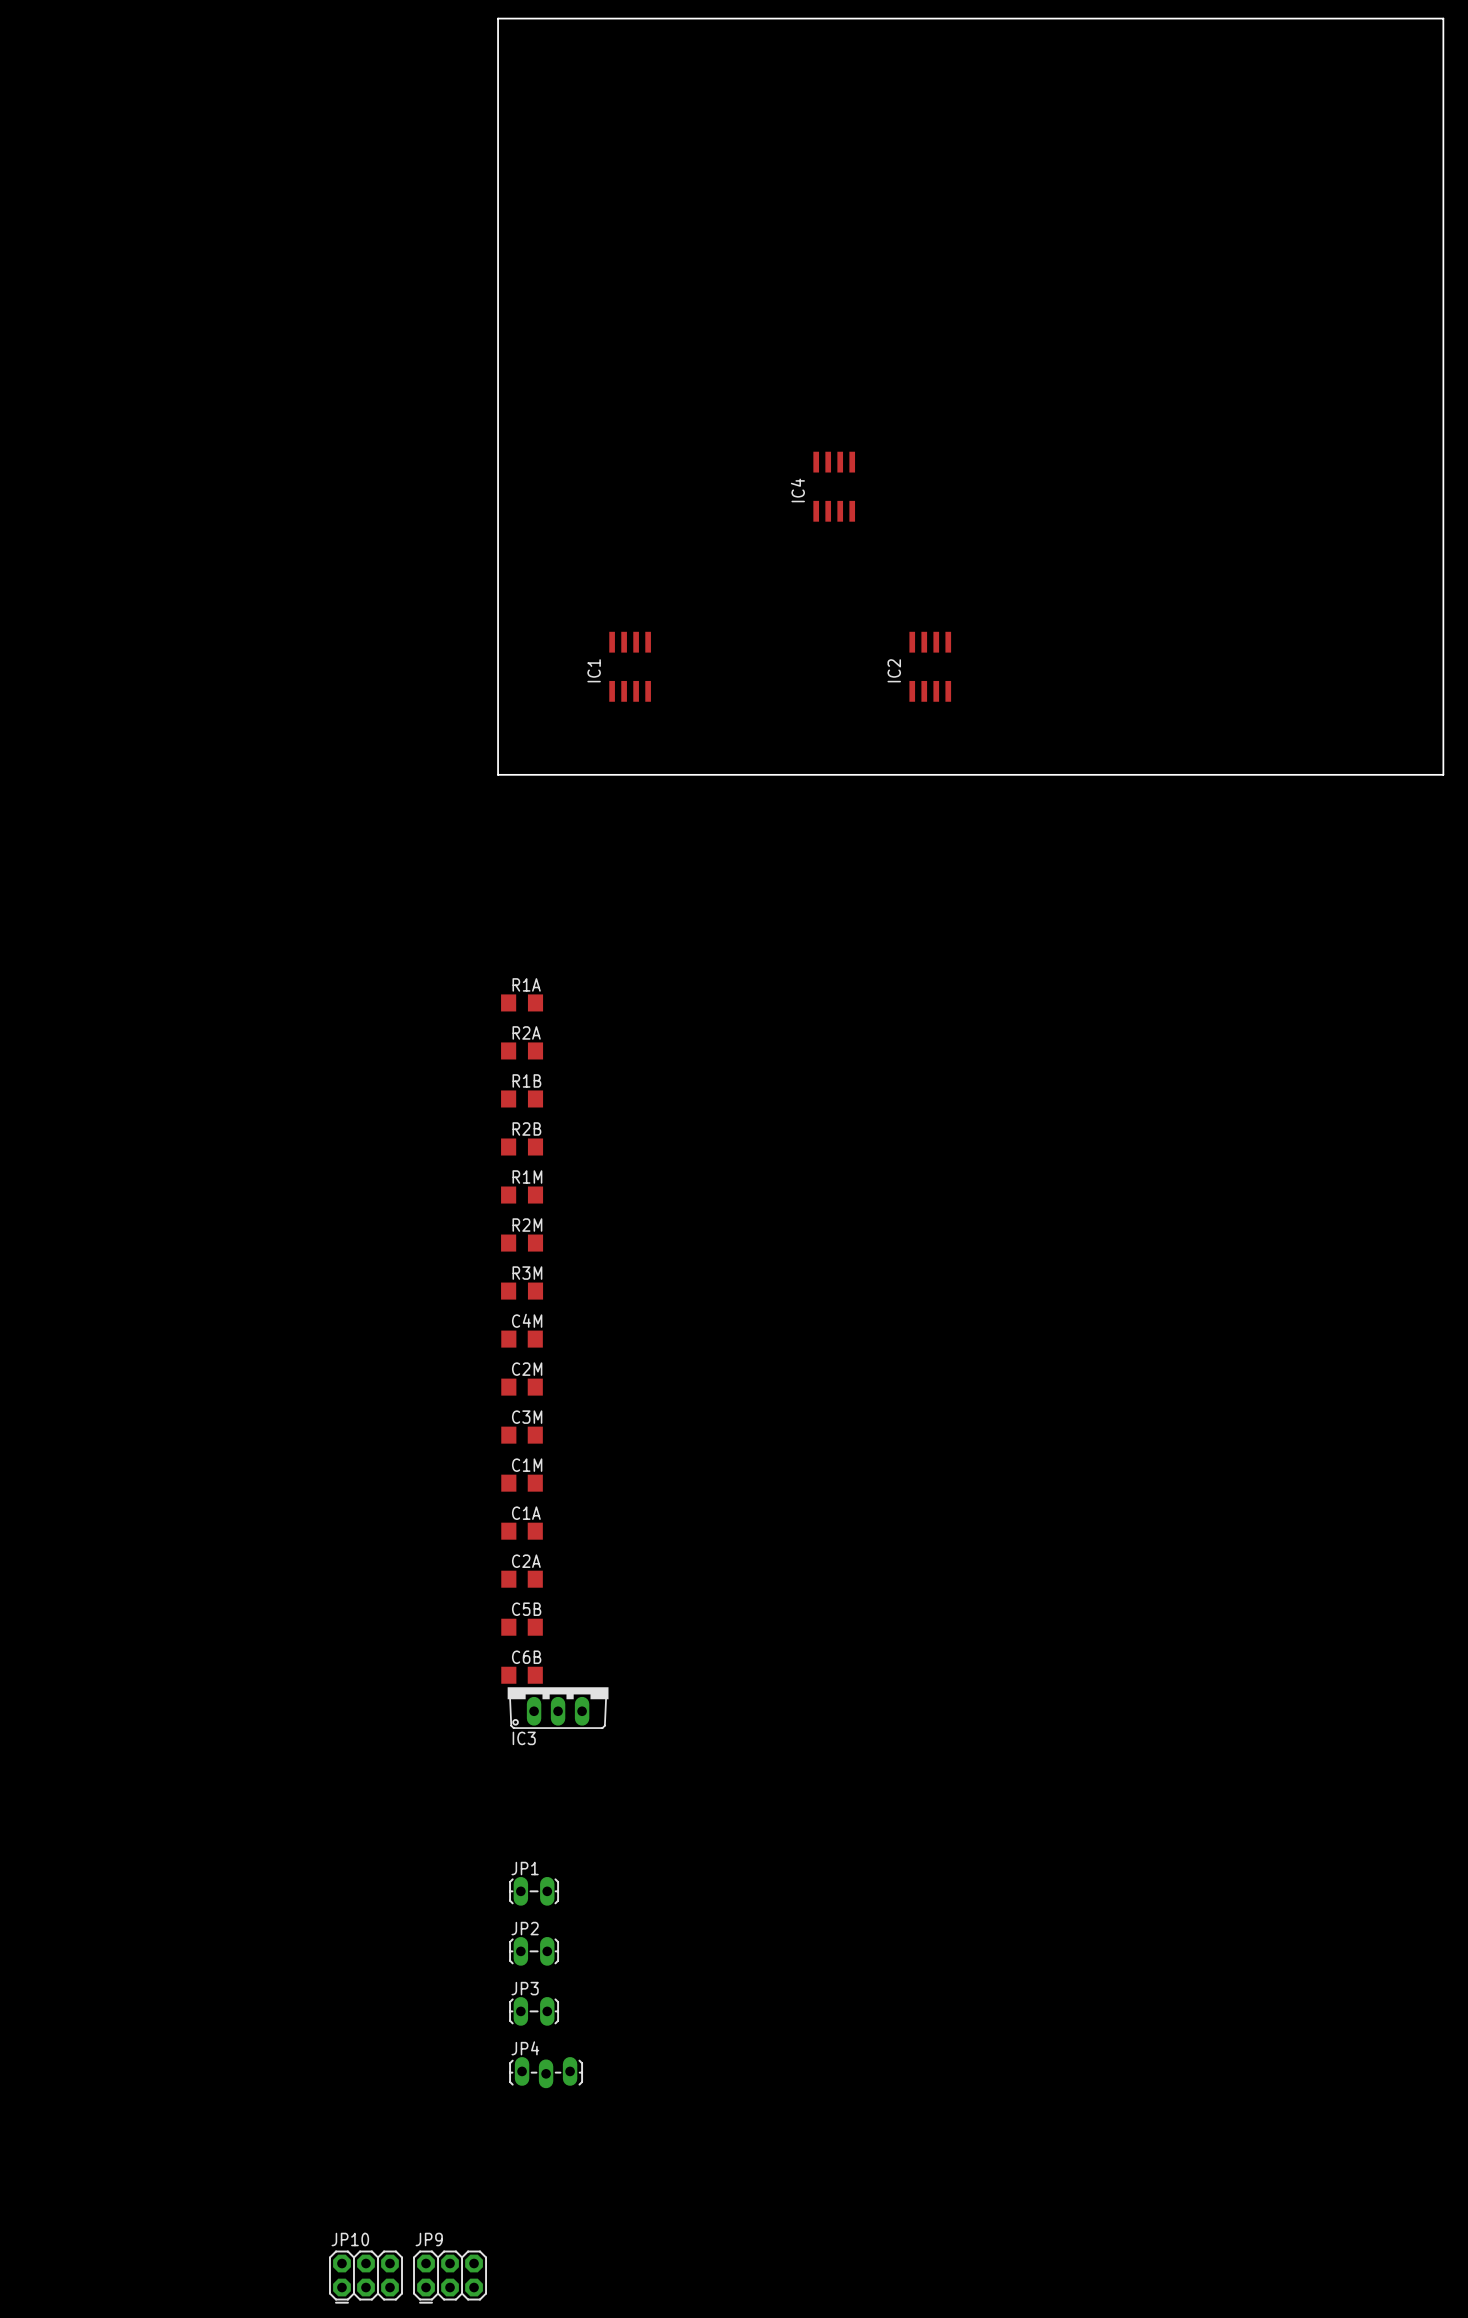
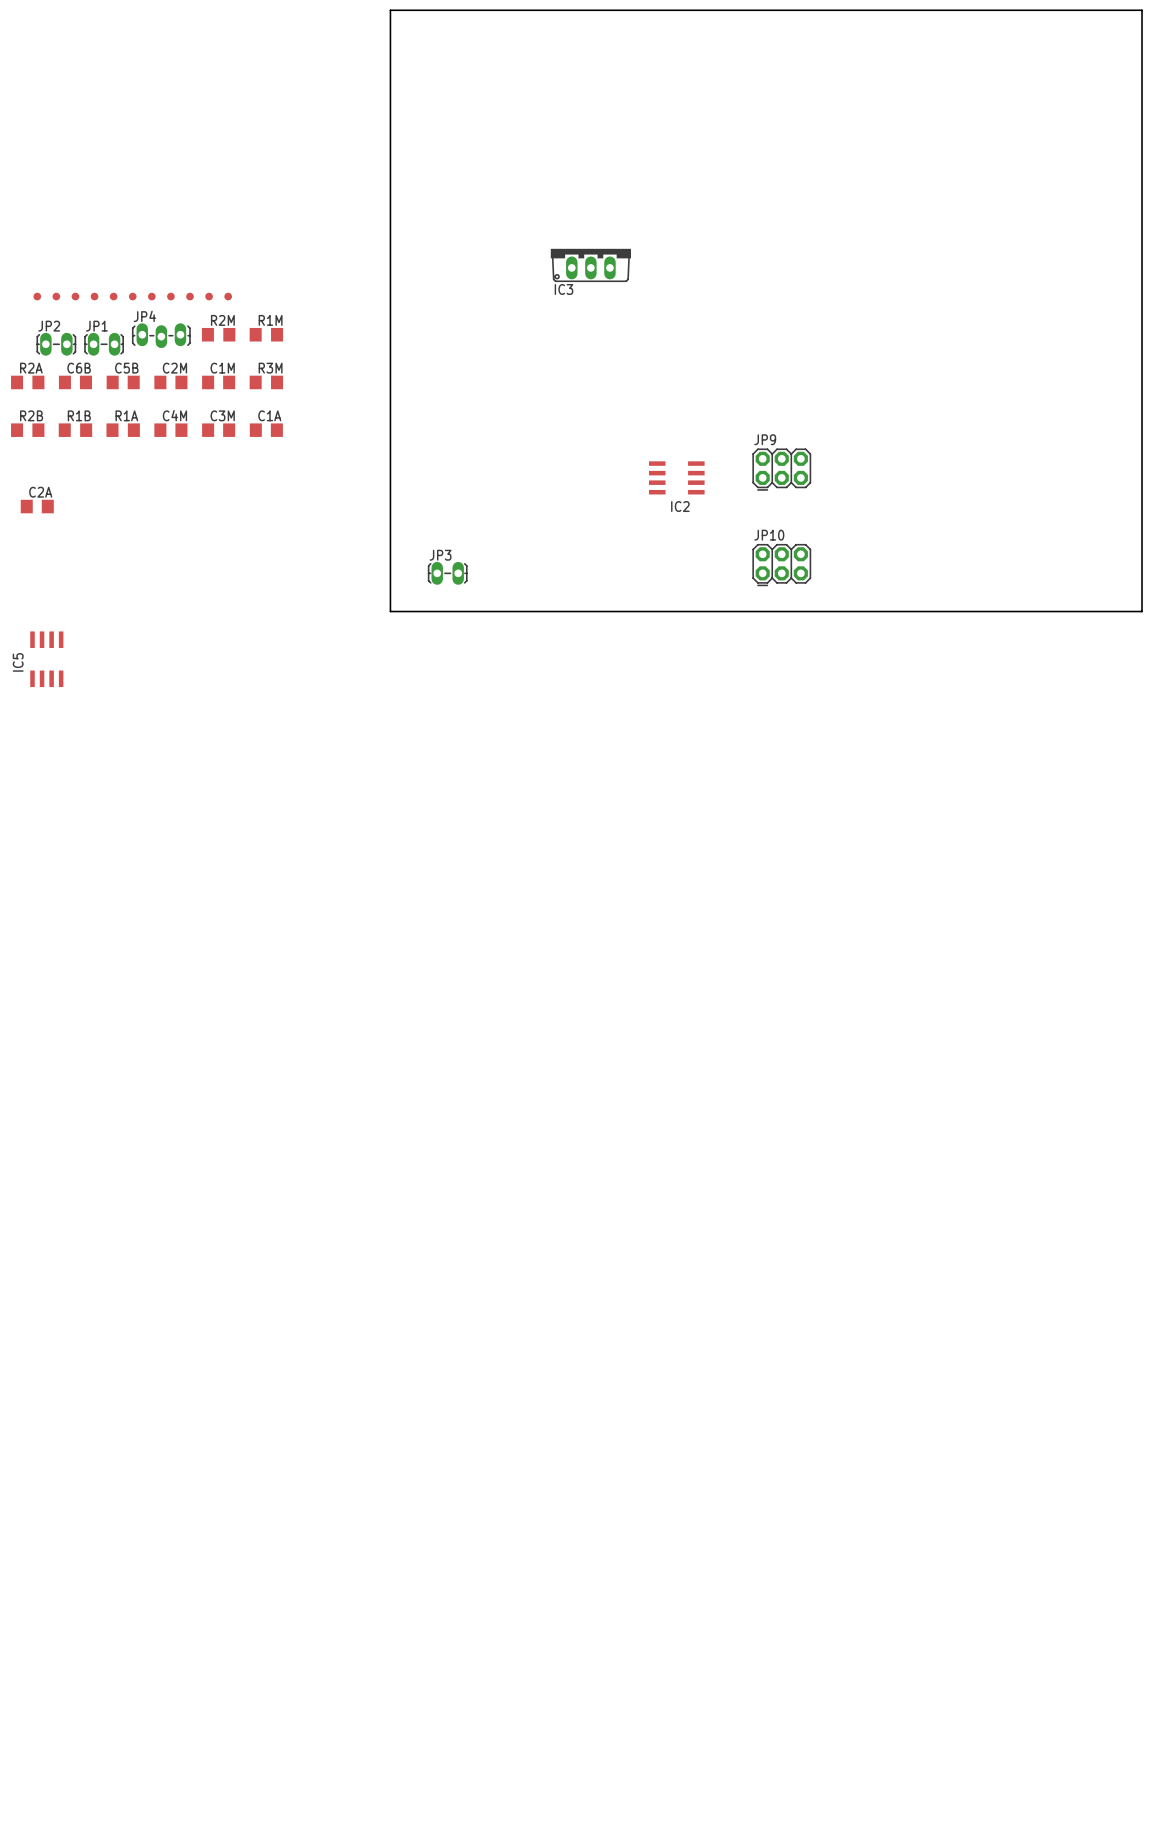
part: none -> (37, 296)
part: none -> (56, 296)
part: none -> (75, 296)
part: none -> (94, 296)
part: none -> (113, 296)
part: none -> (132, 296)
part: none -> (151, 296)
part: none -> (170, 296)
part: none -> (189, 296)
part: none -> (209, 296)
part: none -> (228, 296)
IC4: (834, 486) -> none
IC1: (630, 666) -> none
IC2 rotation: 0° (930, 666) -> 90° clockwise (676, 477)
IC2 position: (930, 666) -> (676, 477)
IC2 name position: IC2 (894, 670) -> IC2 (680, 506)
IC5: none -> (46, 659)
R1A position: (522, 1002) -> (123, 430)
R2A position: (522, 1050) -> (27, 382)
R1B position: (522, 1098) -> (75, 430)
R2B position: (522, 1147) -> (27, 430)
R1M position: (522, 1195) -> (266, 334)
R2M position: (522, 1243) -> (218, 334)
R3M position: (522, 1291) -> (266, 382)
C4M position: (522, 1339) -> (170, 430)
C2M position: (522, 1387) -> (170, 382)
C3M position: (522, 1435) -> (218, 430)
C1M position: (522, 1483) -> (218, 382)
C1A position: (522, 1531) -> (266, 430)
C2A position: (522, 1579) -> (37, 506)
C5B position: (522, 1627) -> (123, 382)
C6B position: (522, 1675) -> (75, 382)
IC3 position: (558, 1707) -> (590, 265)
JP1 position: (534, 1891) -> (104, 344)
JP2 position: (534, 1951) -> (56, 344)
JP3 position: (534, 2011) -> (447, 573)
JP4 position: (546, 2072) -> (161, 335)
JP10 position: (365, 2277) -> (781, 565)
JP9 position: (450, 2277) -> (781, 469)

